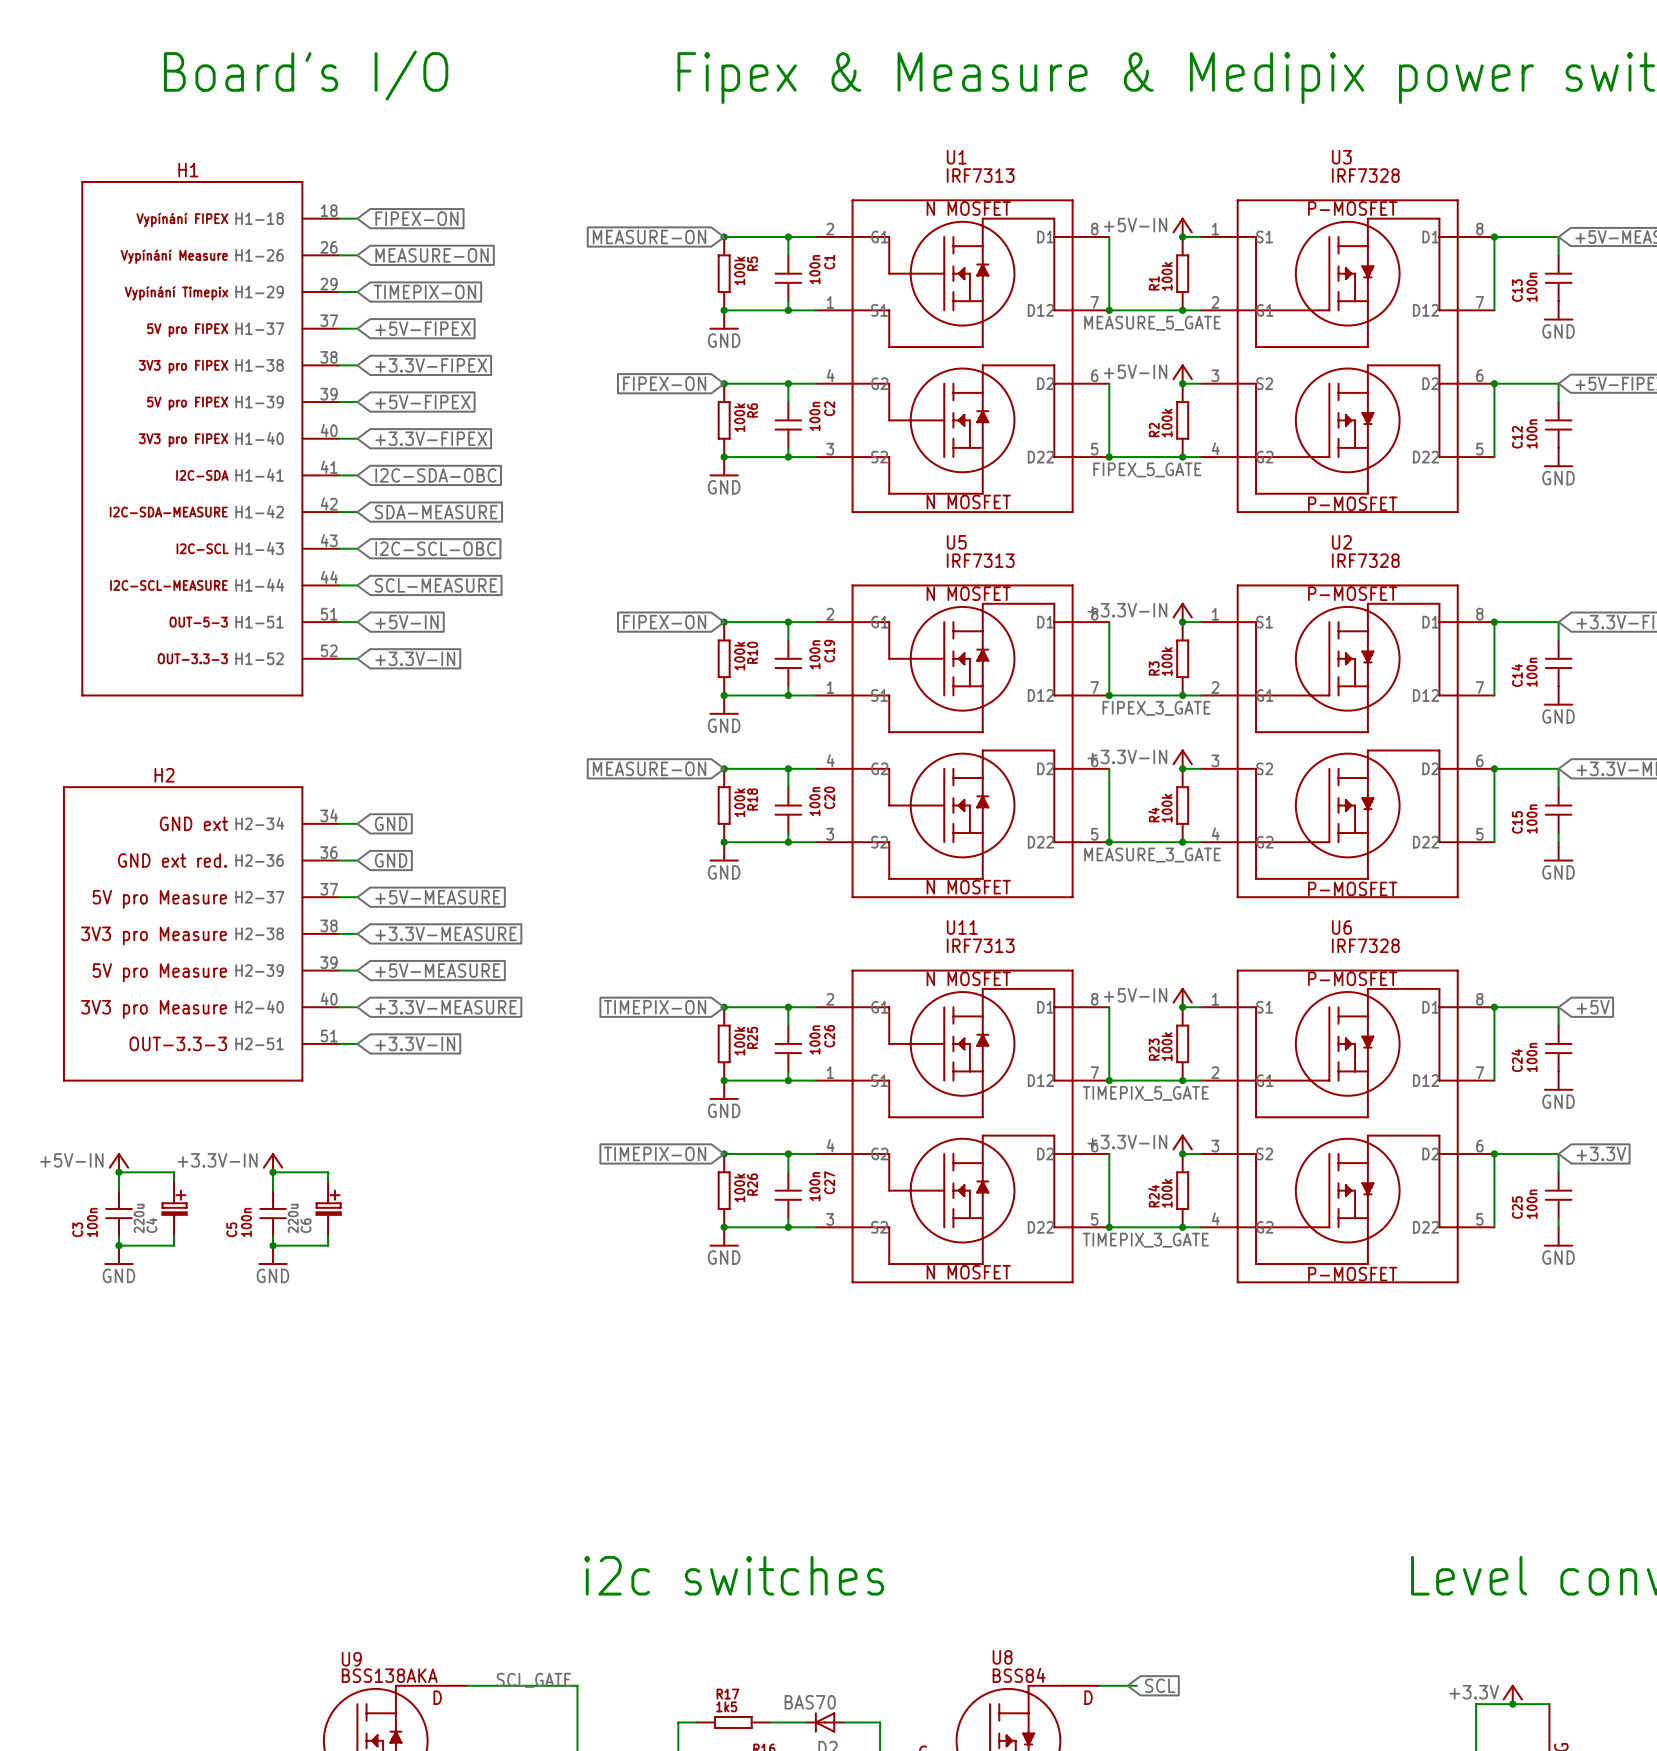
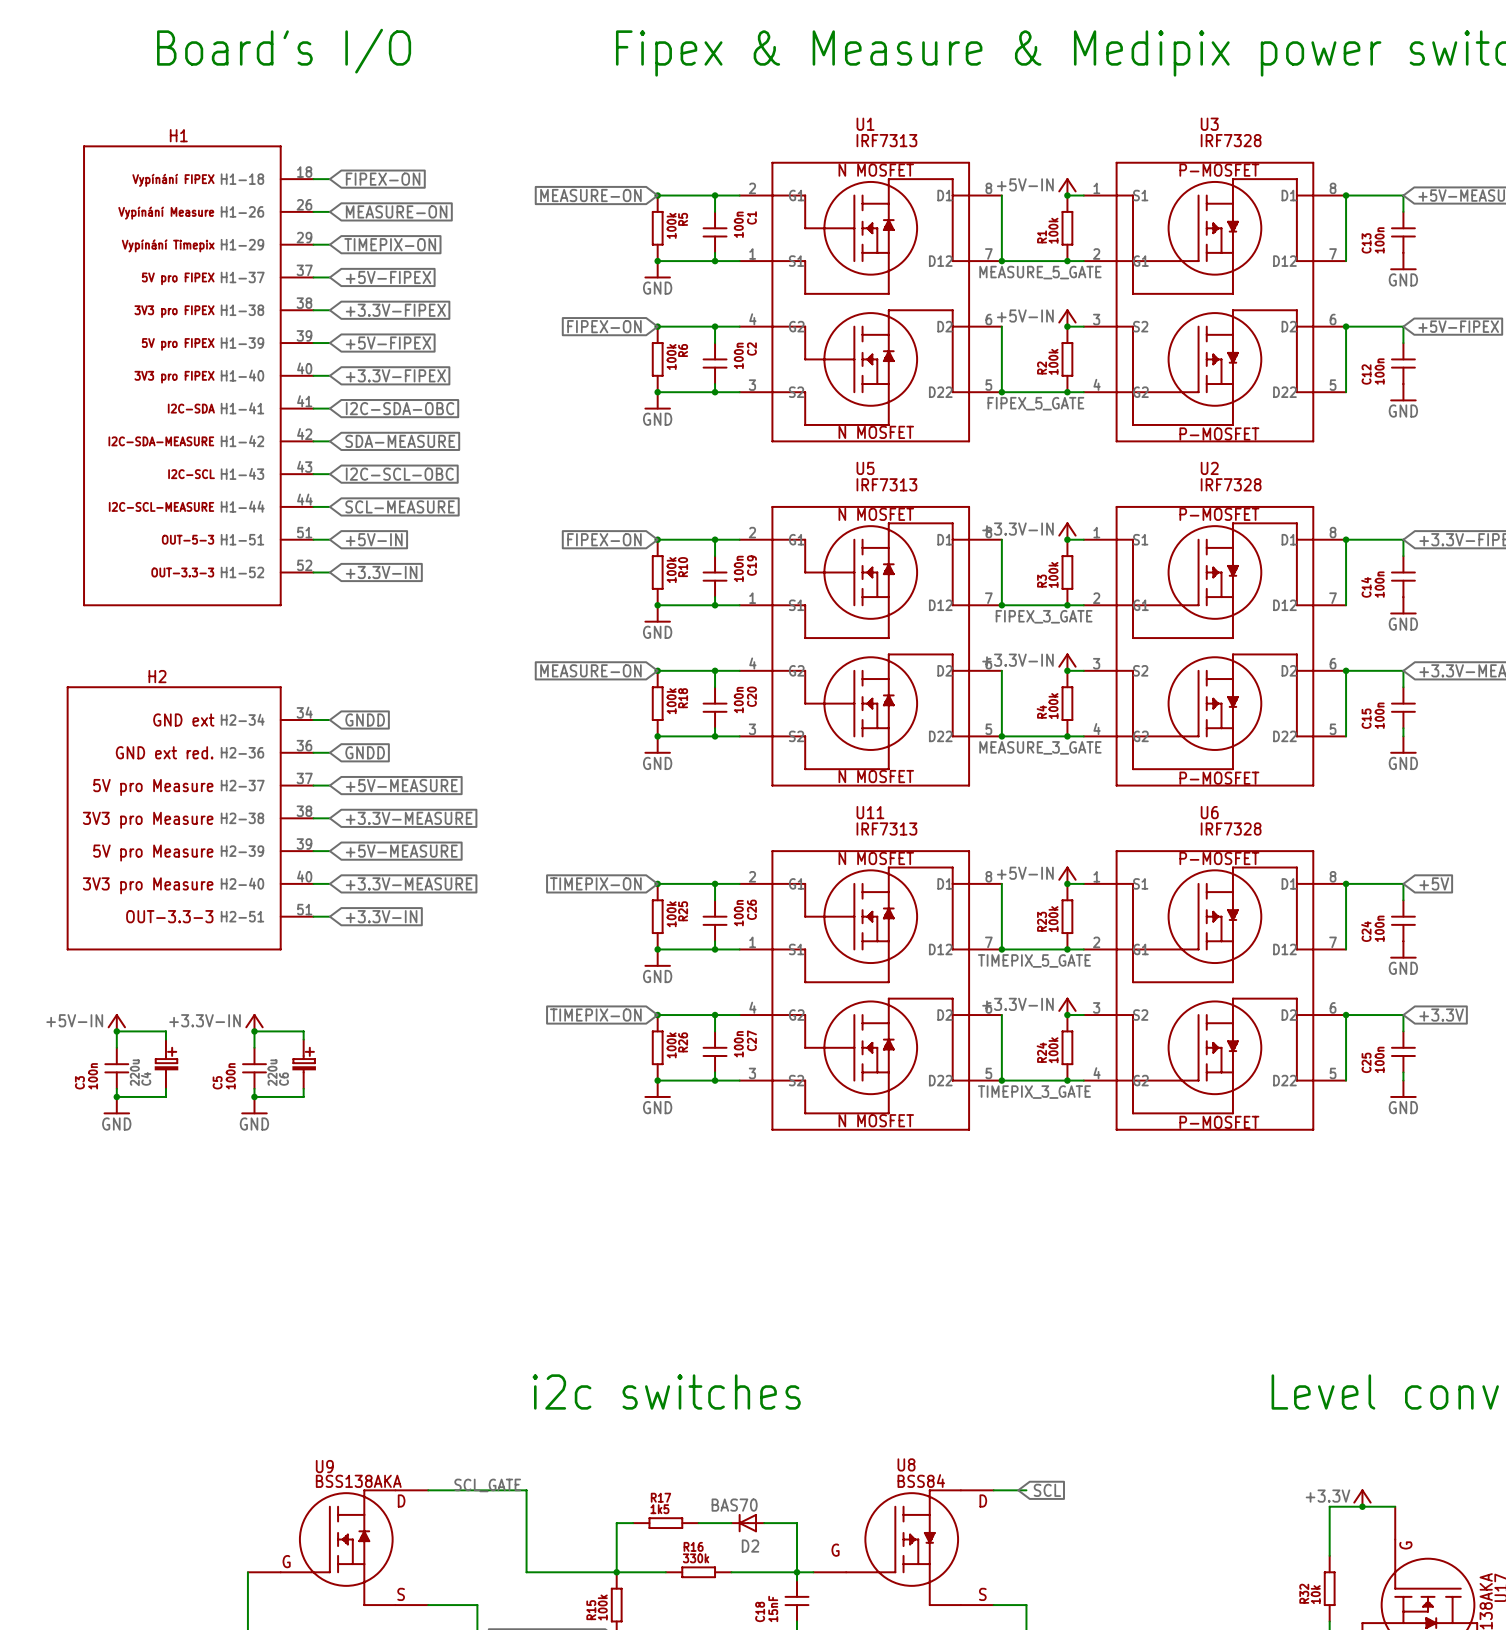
global label: GND (391, 823) -> GNDD (365, 720)
global label: GND (391, 860) -> GNDD (365, 752)

